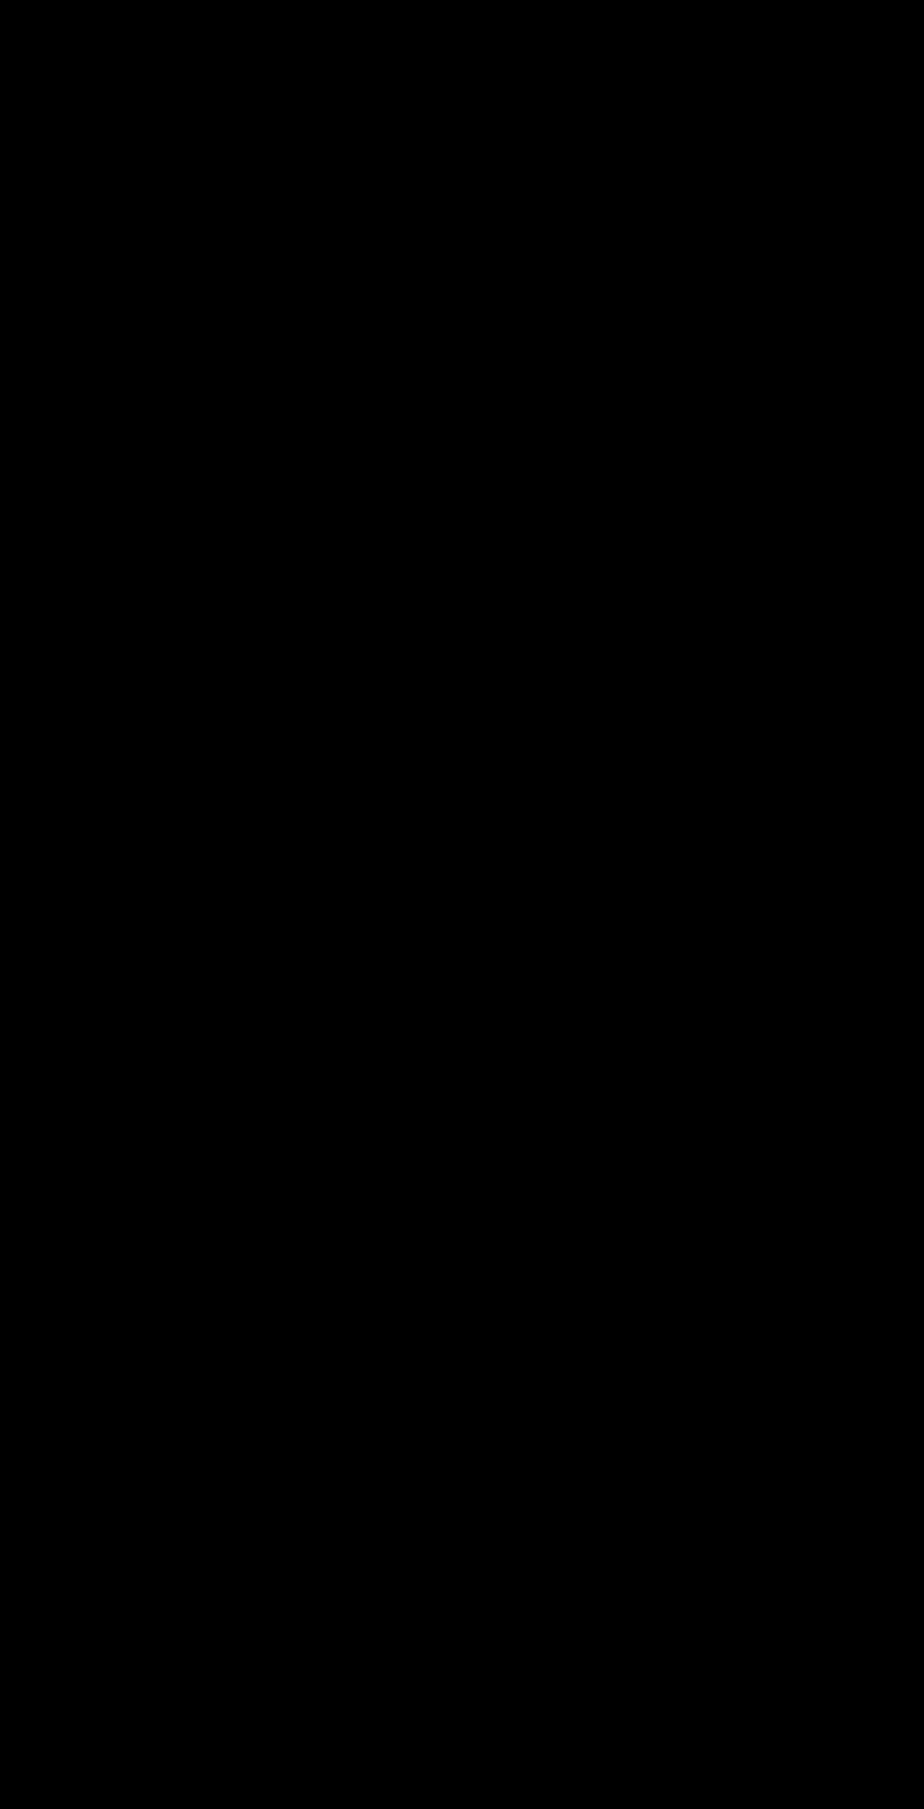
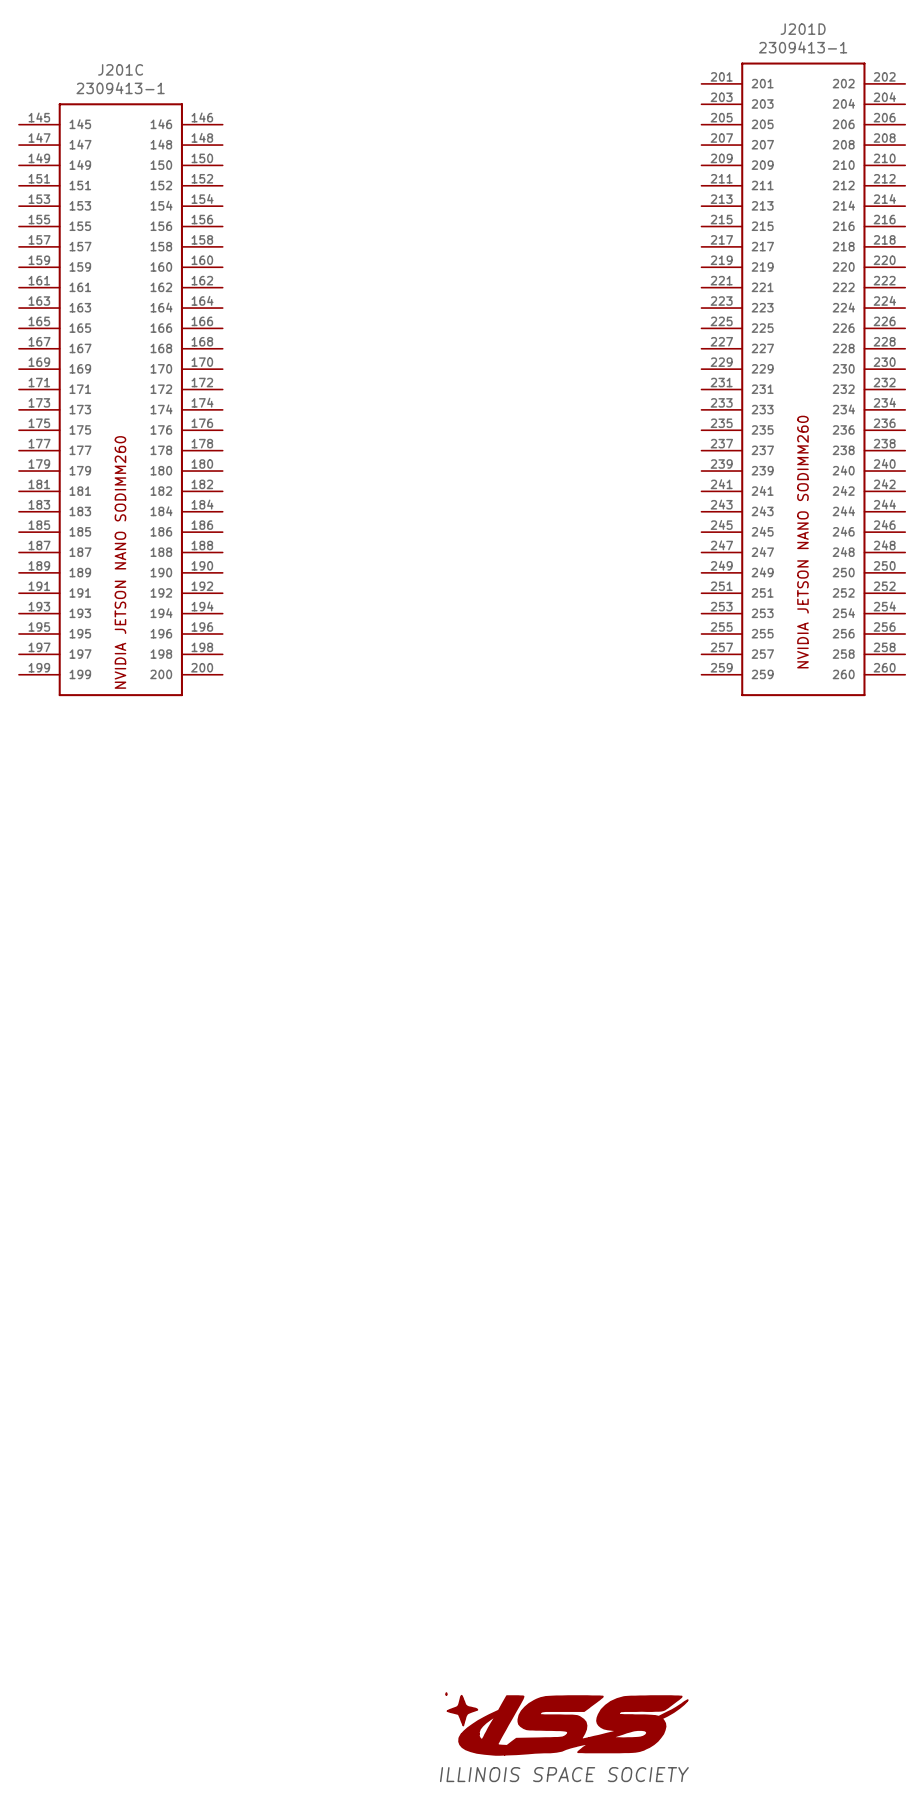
J201D: none -> 2309413-1 (803, 379)
J201C: none -> 2309413-1 (120, 399)
power symbol: none -> (567, 1723)
text: none -> ILLINOIS SPACE SOCIETY (564, 1774)

